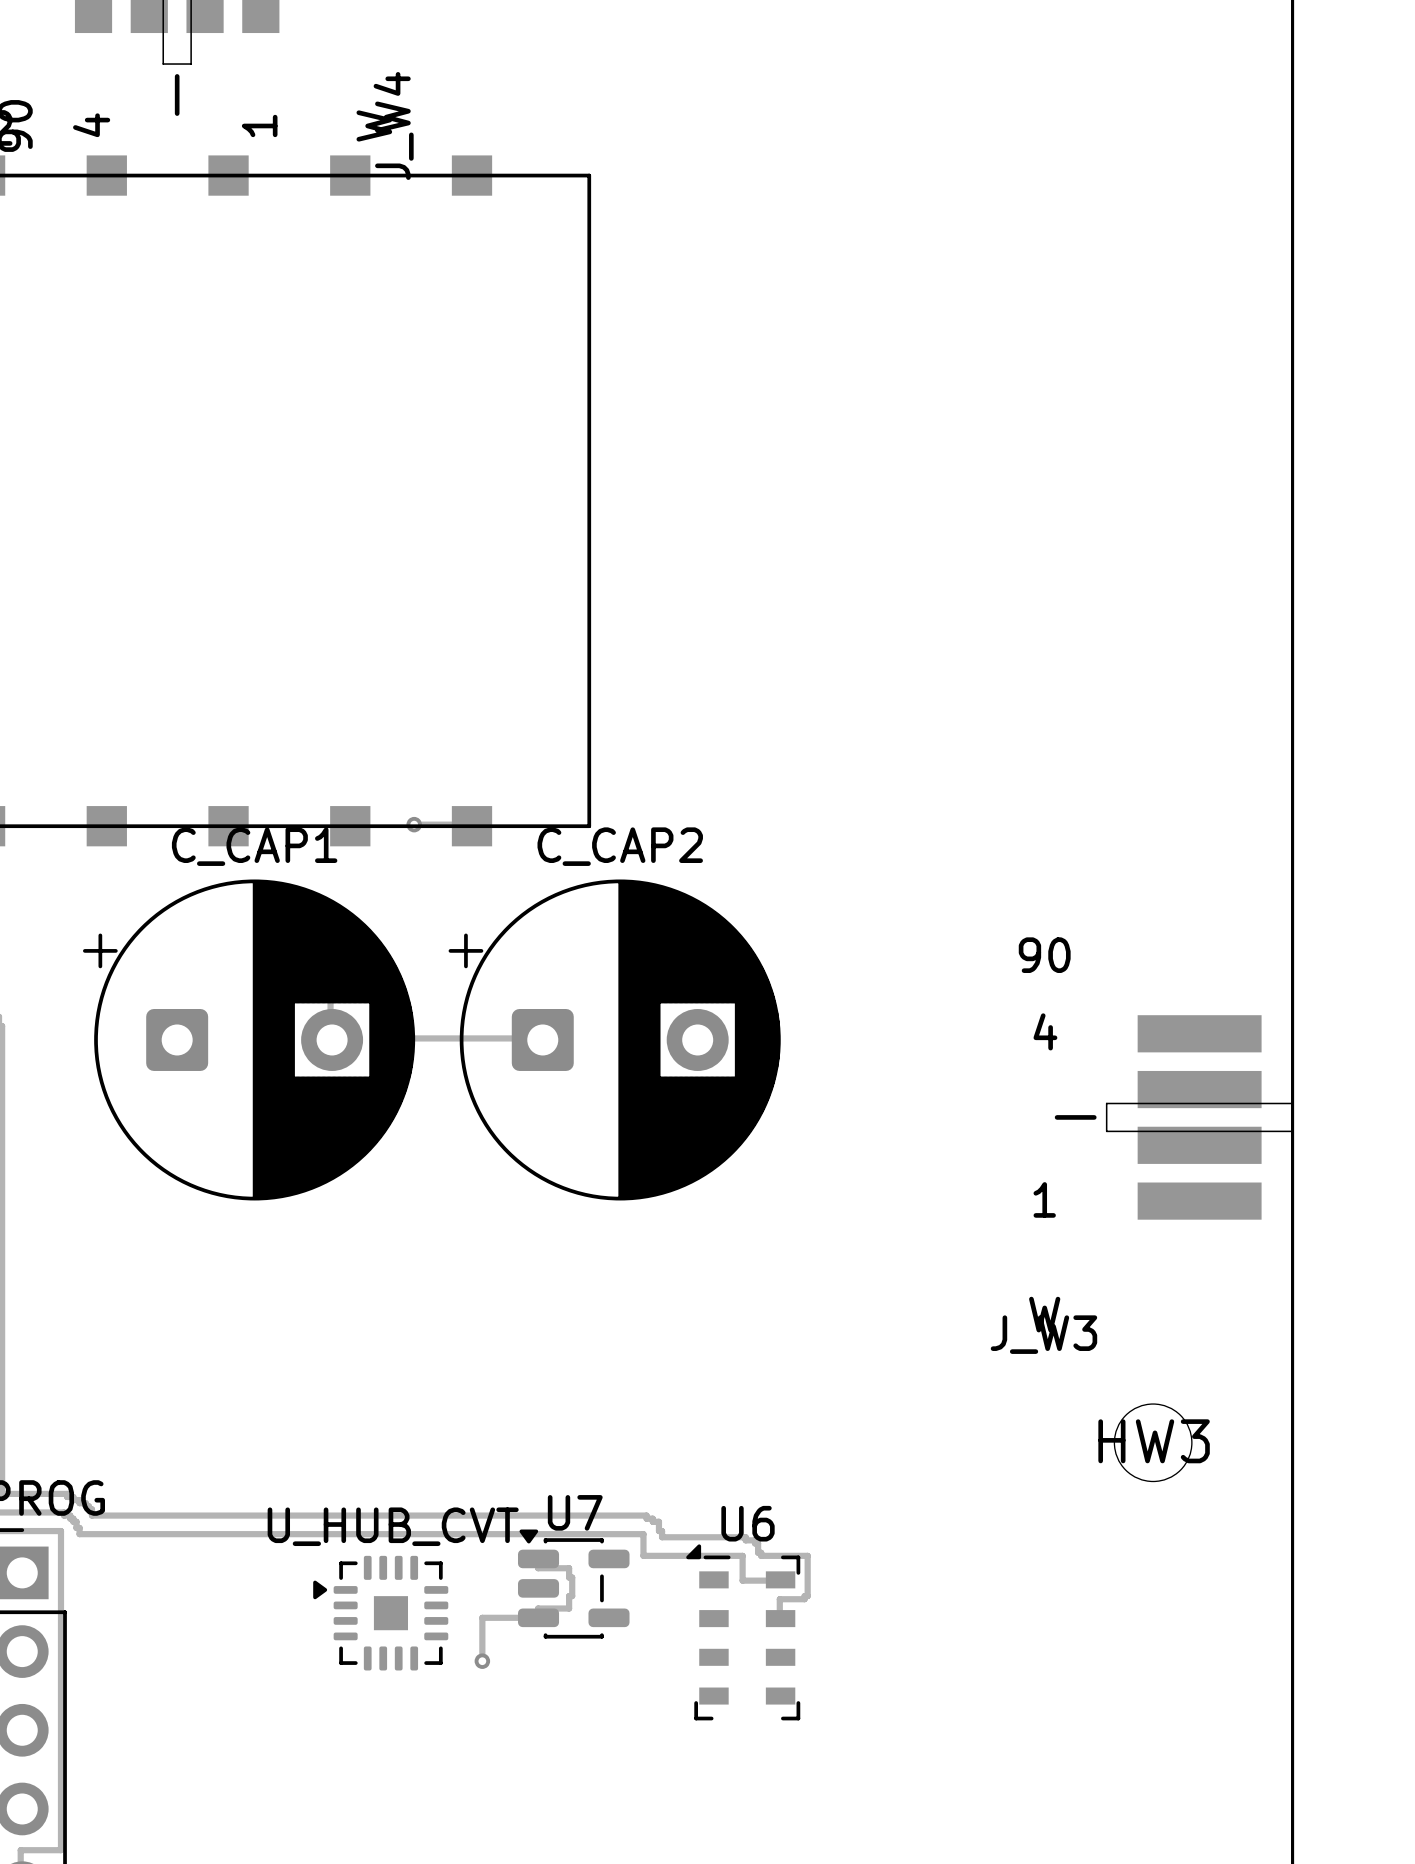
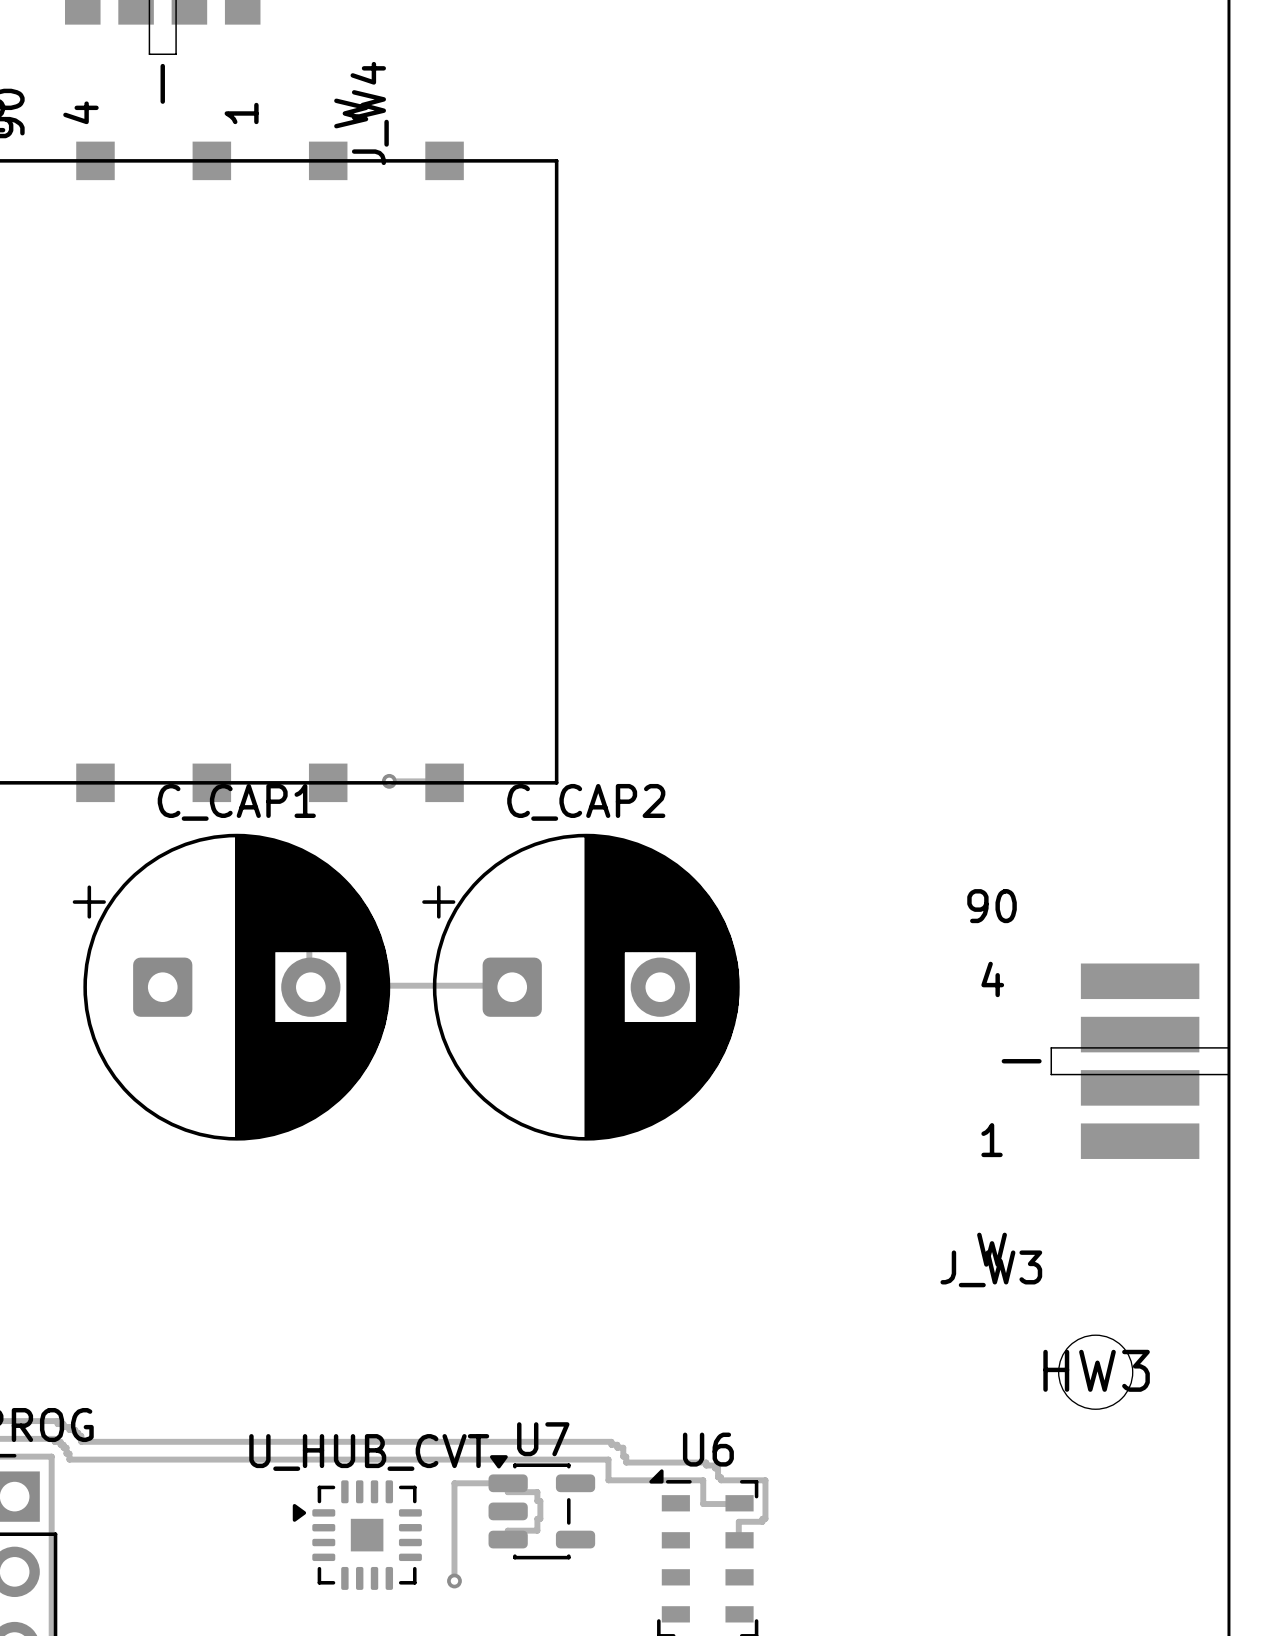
track: (482, 1617) (538, 1617) -> (454, 1539) (454, 1483) (507, 1483)

